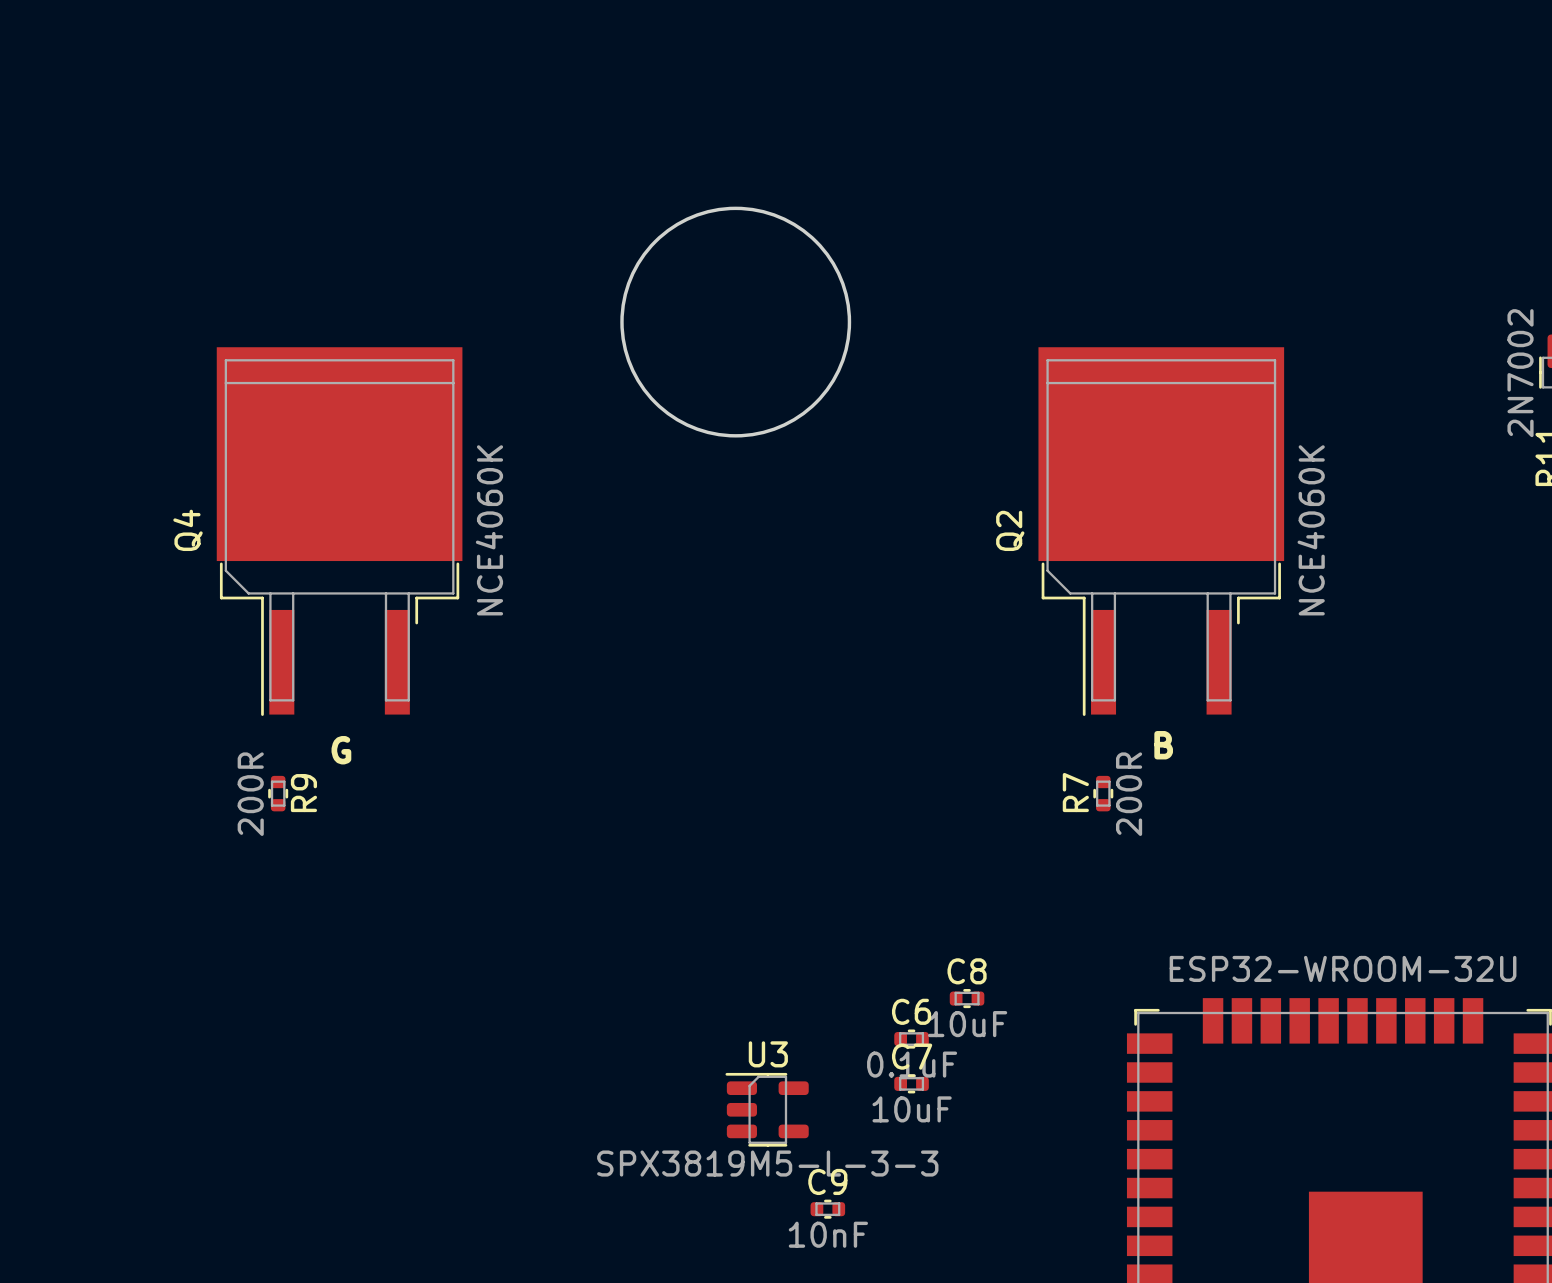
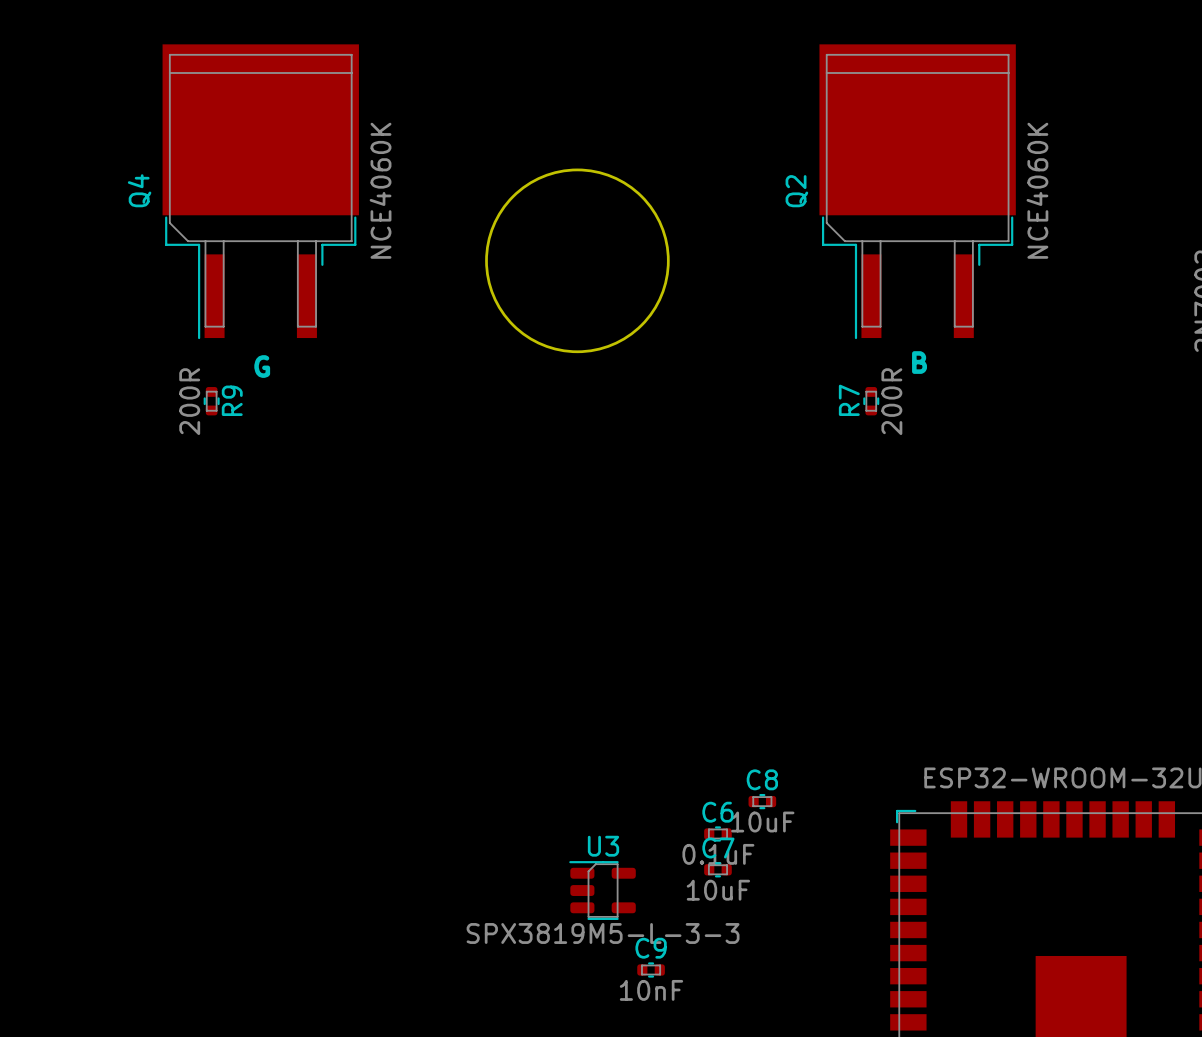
Q4 position: (339, 531) -> (260, 191)
Q2 position: (1161, 531) -> (917, 191)
text position: B (1163, 745) -> B (919, 362)
text position: G (341, 750) -> G (262, 366)
R9 position: (278, 793) -> (211, 401)
R7 position: (1103, 793) -> (871, 401)

